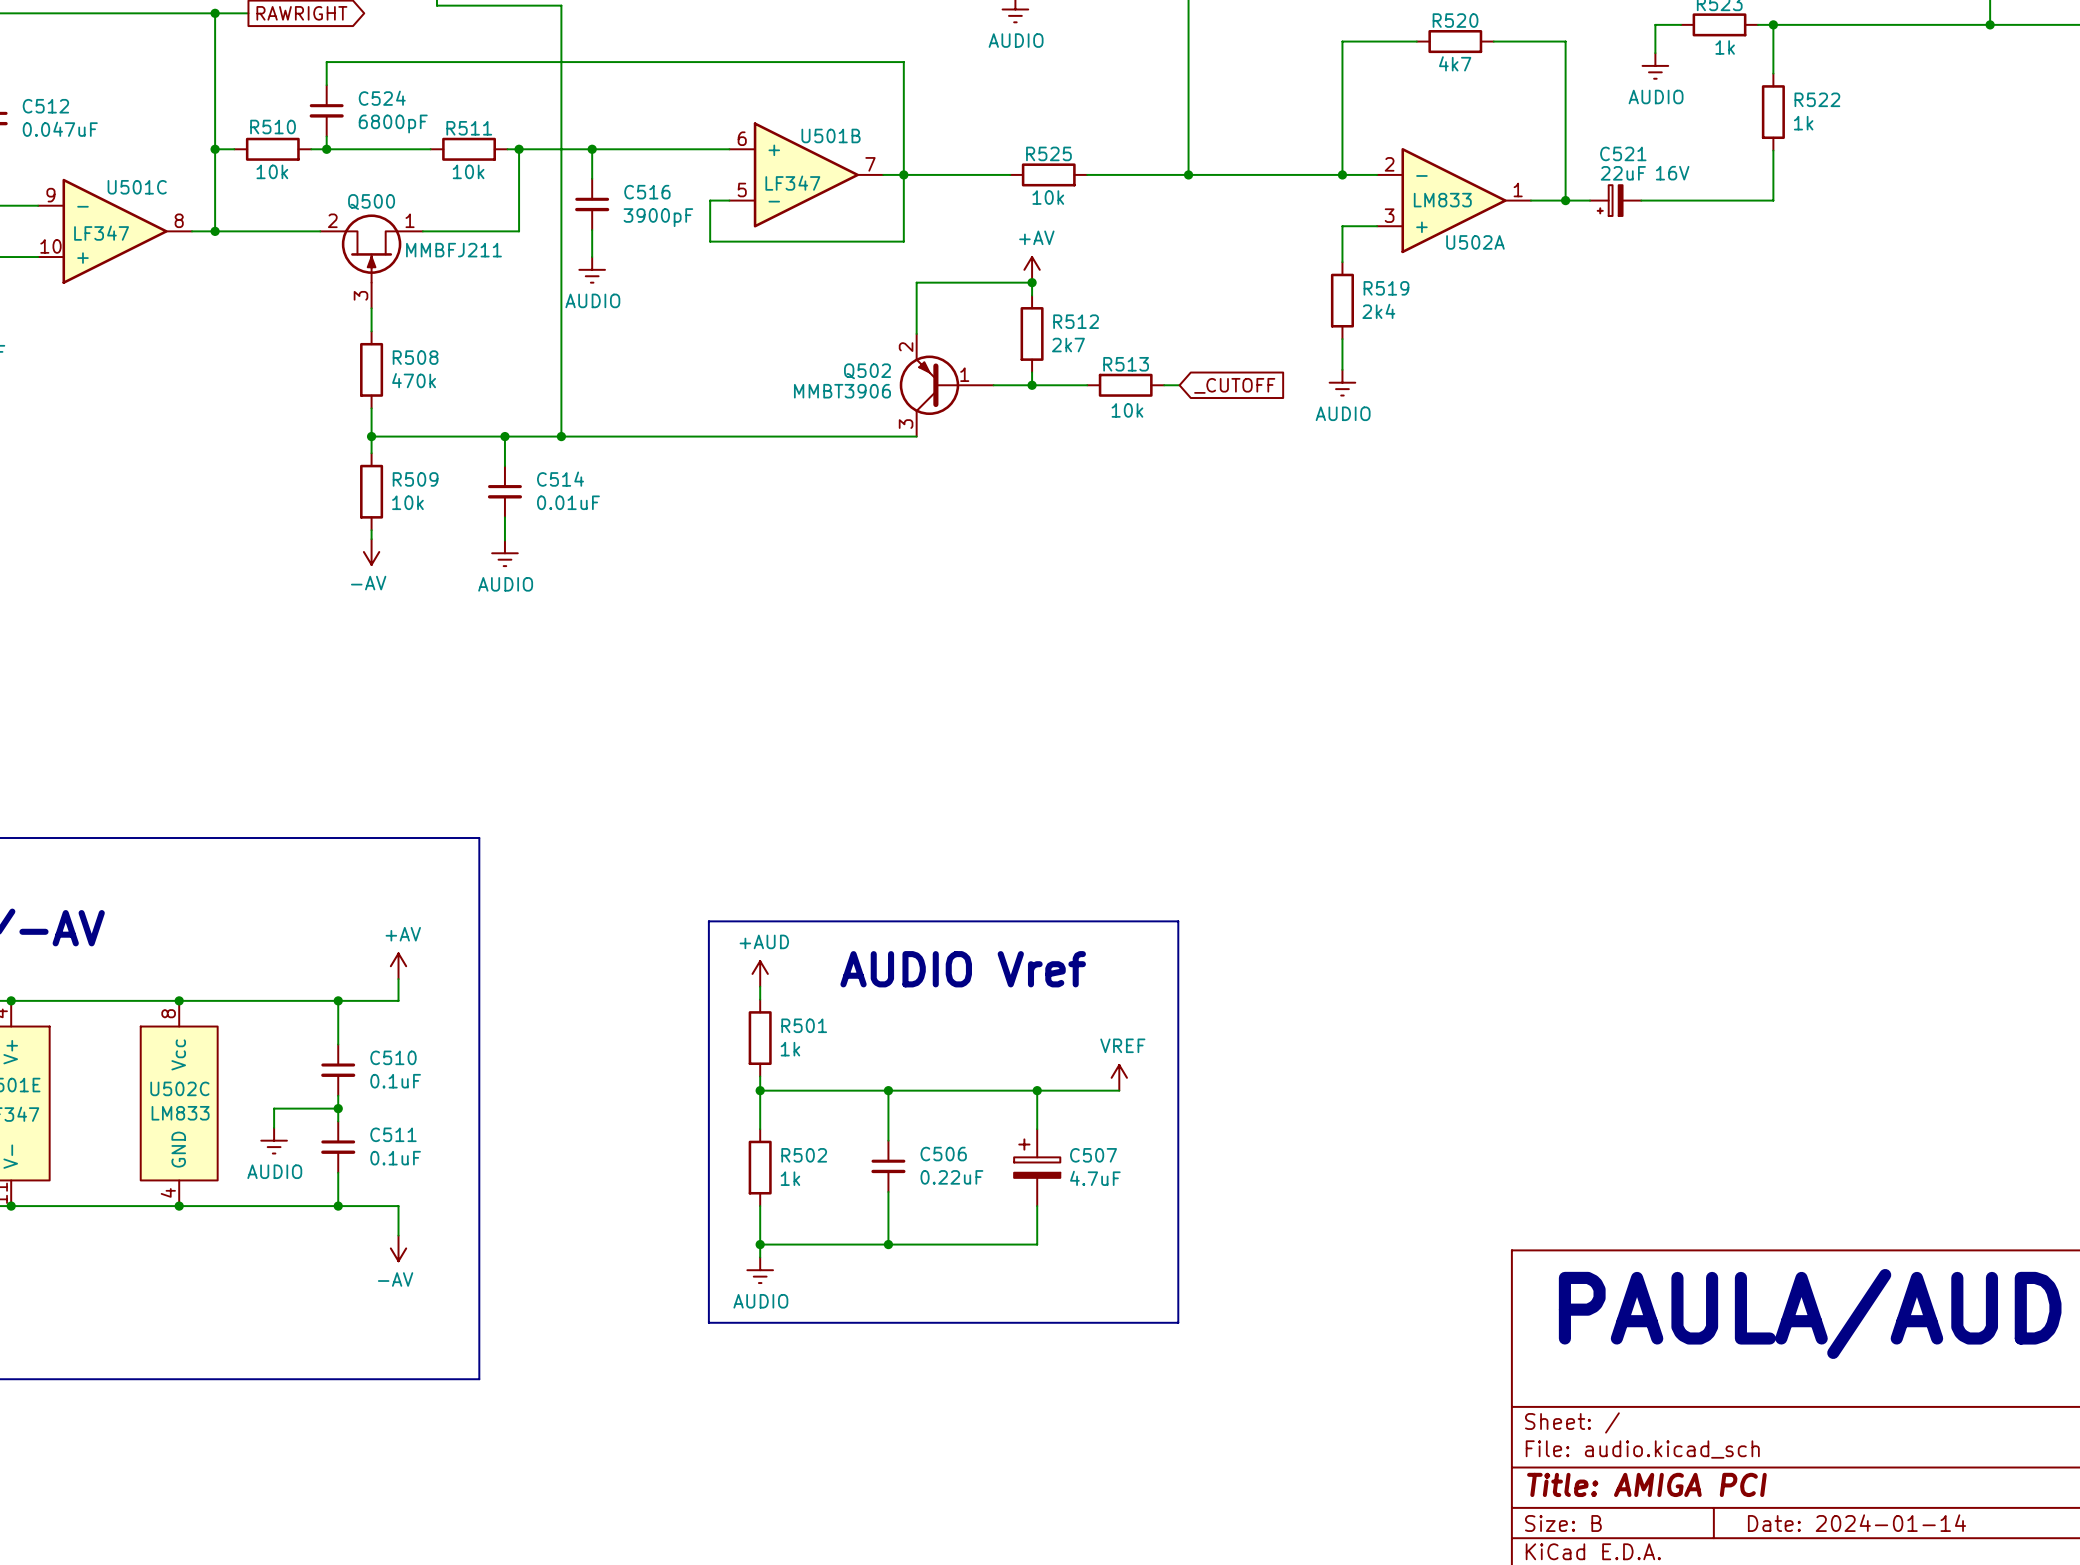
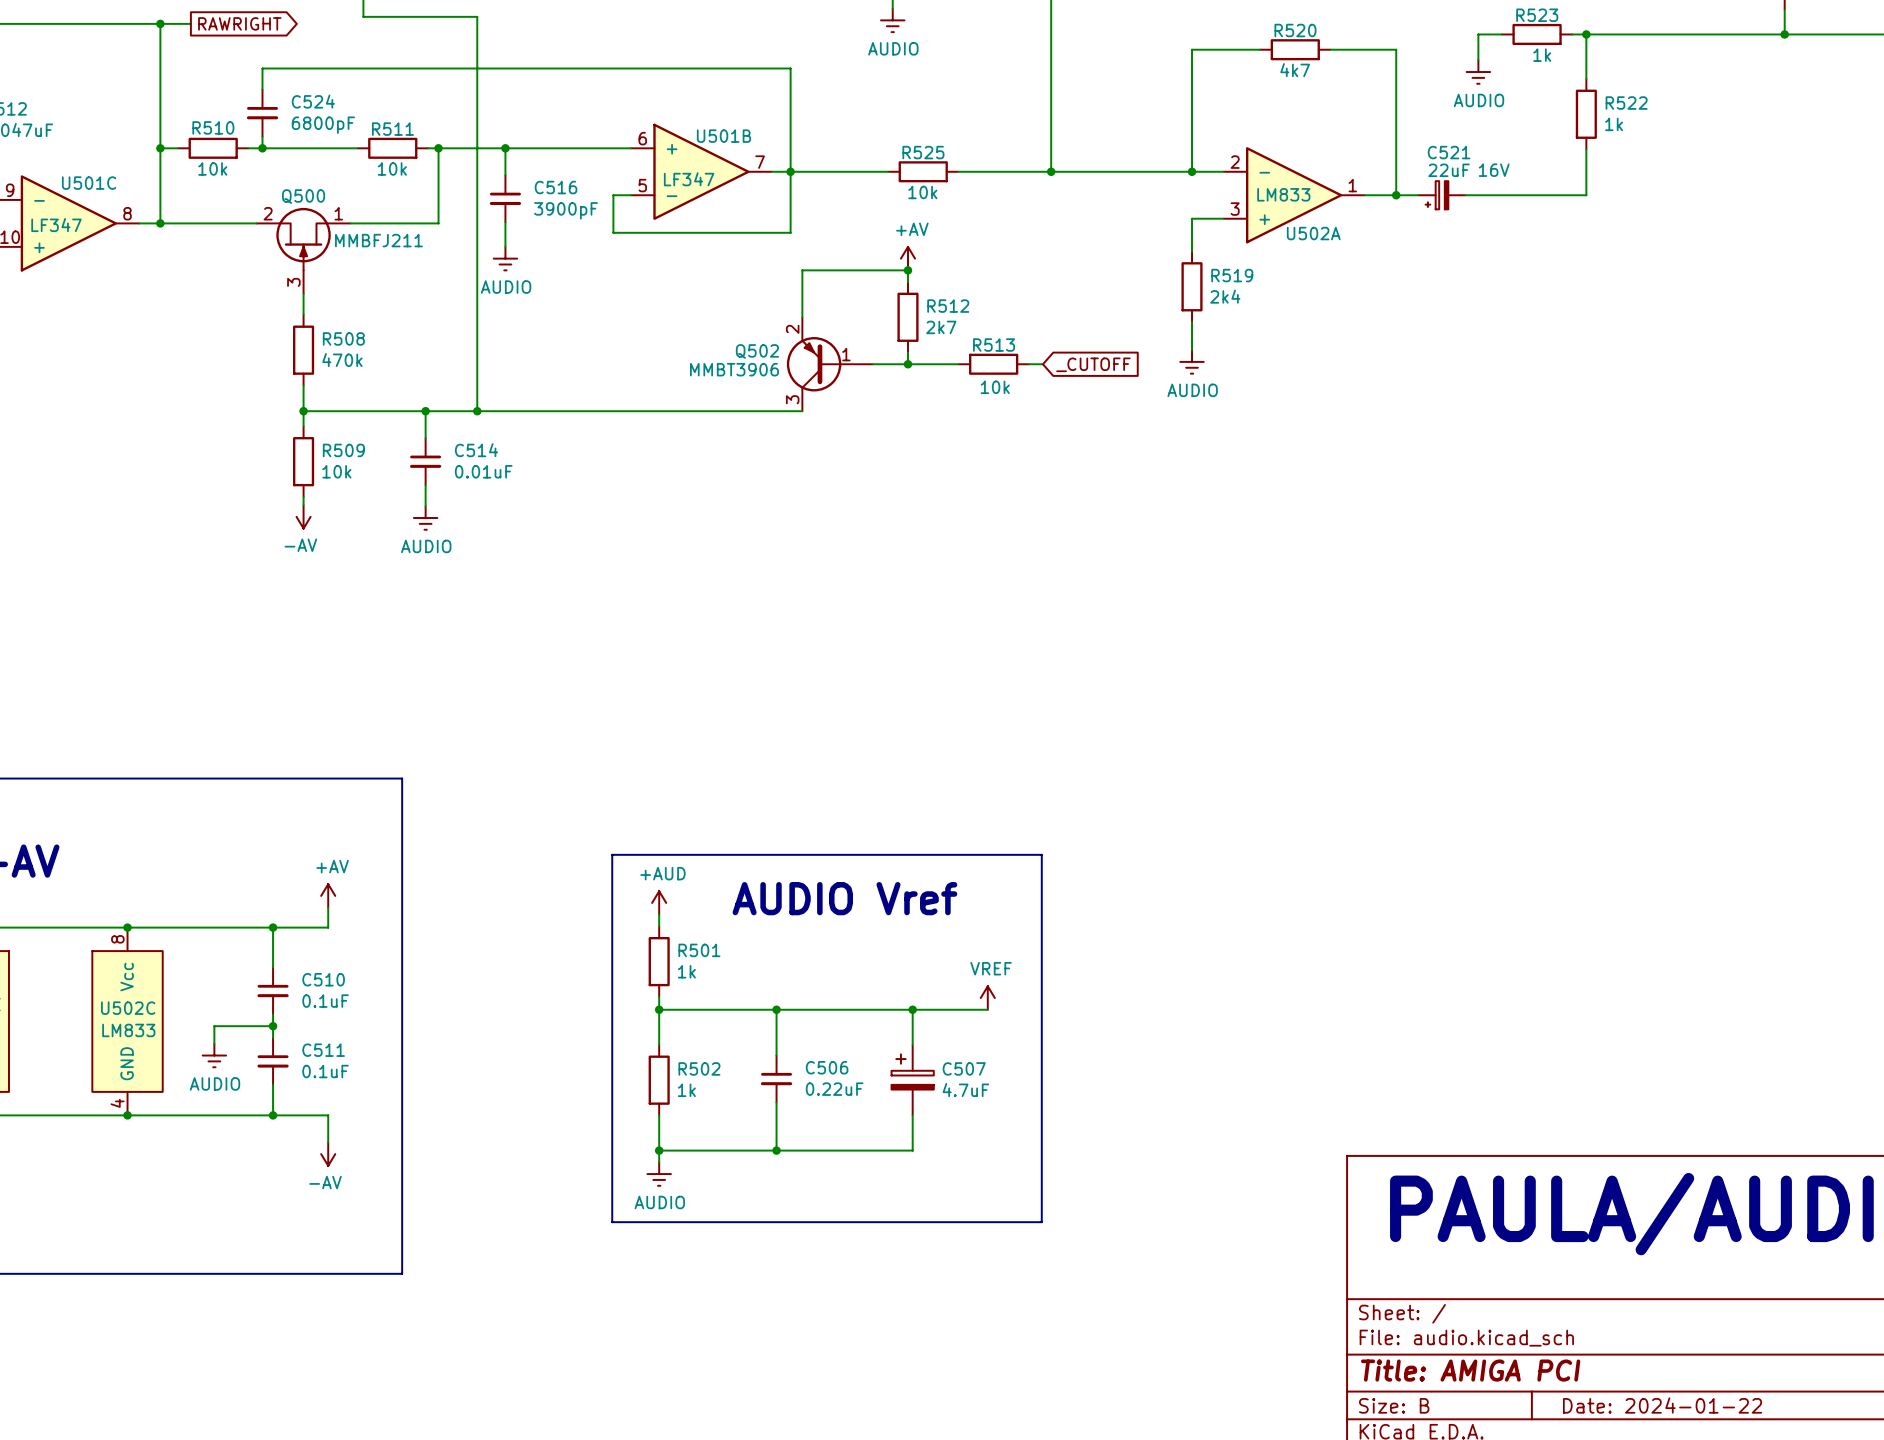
title block: Date: 2024-01-14 (1856, 1523) -> Date: 2024-01-22 (1662, 1405)

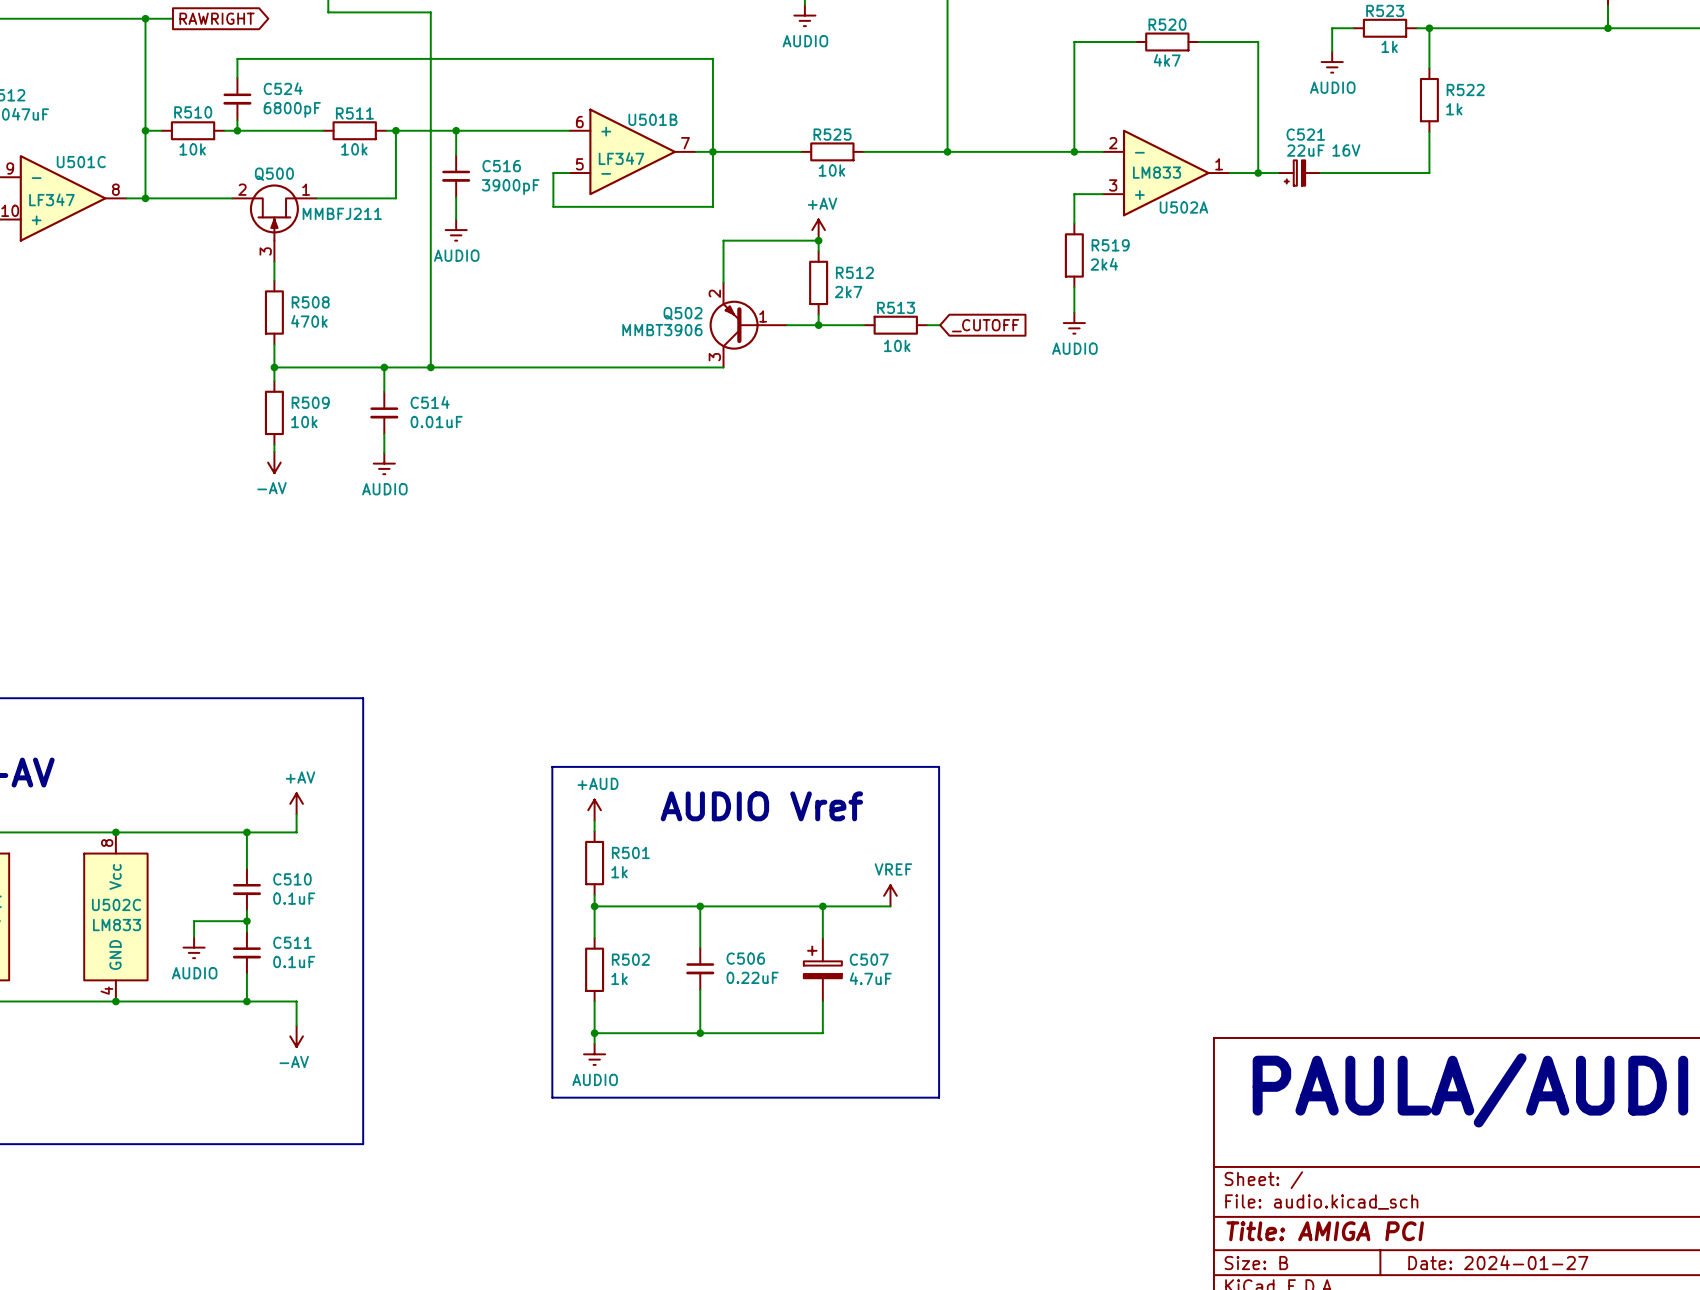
title block: Date: 2024-01-22 (1662, 1405) -> Date: 2024-01-27 (1498, 1262)

